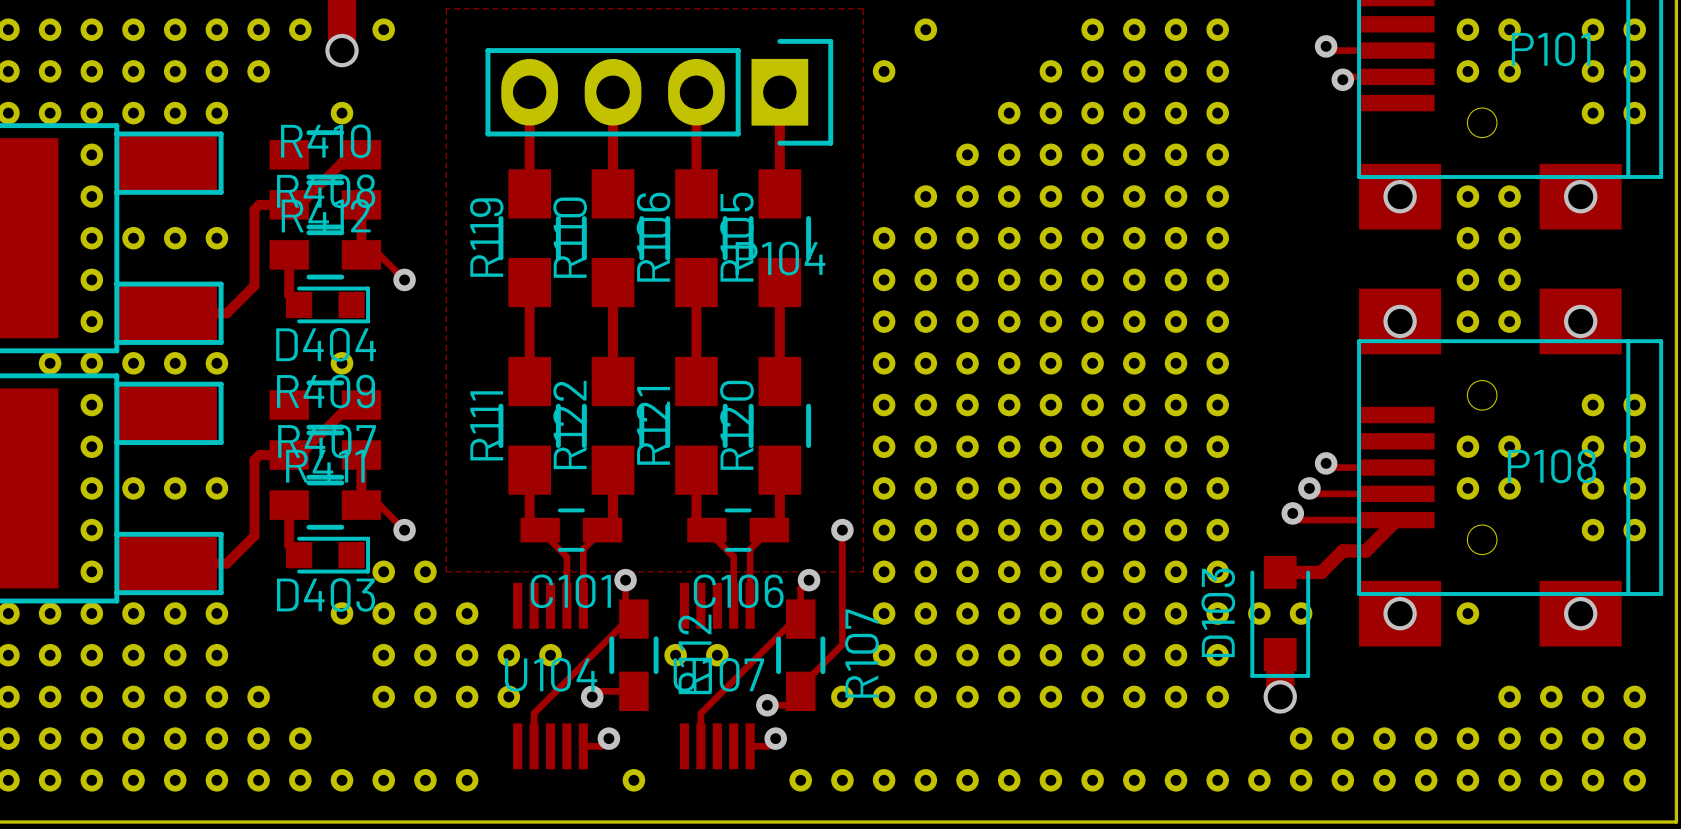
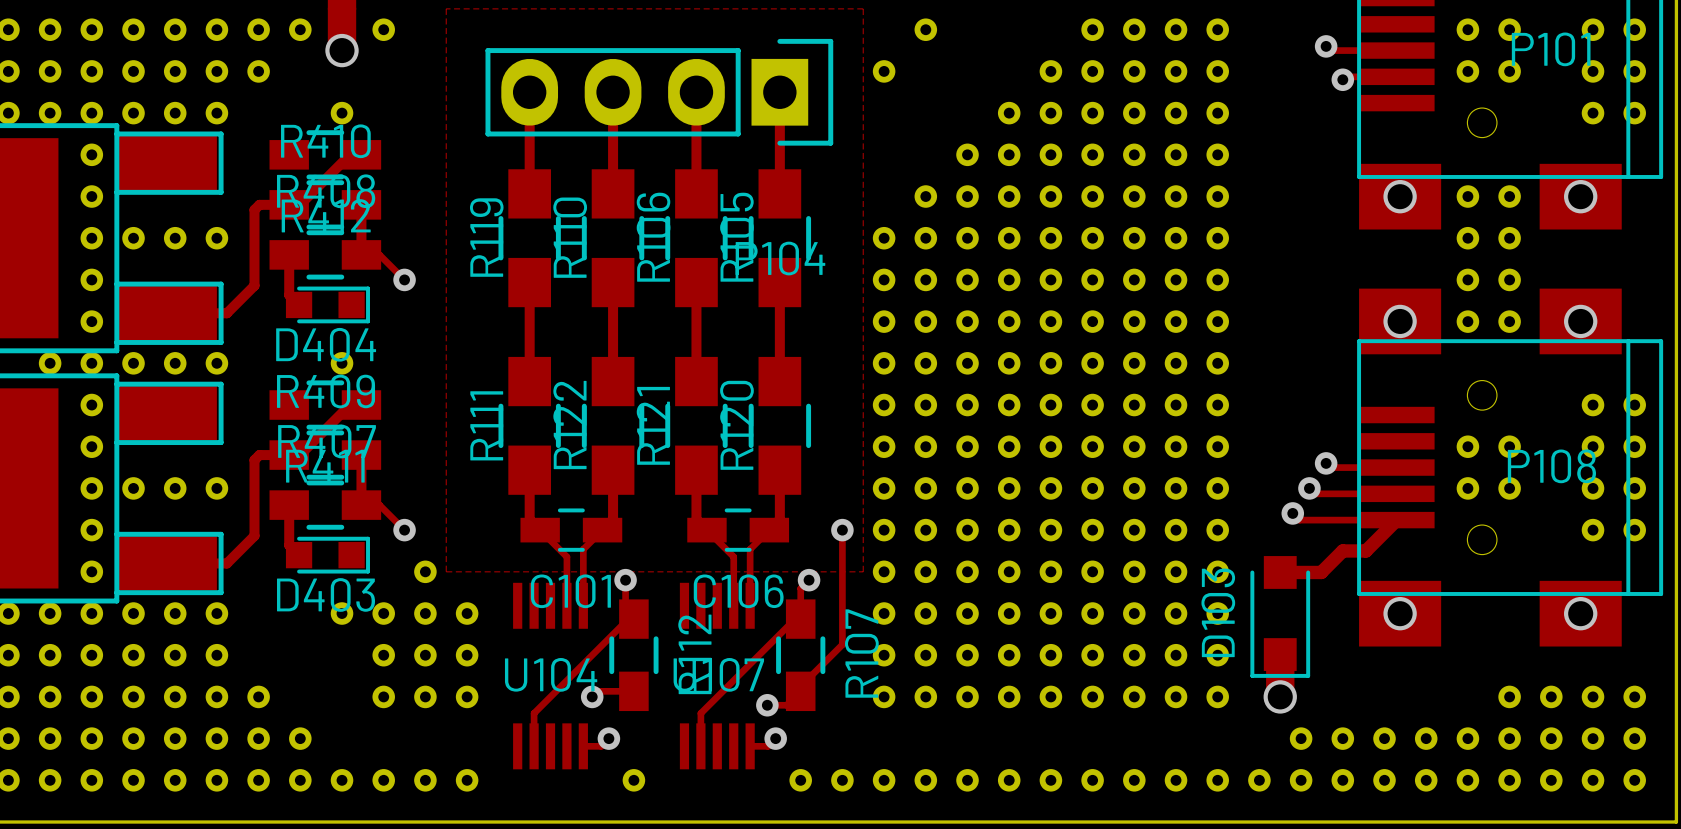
part: (383, 571) -> none
part: (1259, 613) -> none
part: (1301, 613) -> none
part: (1467, 613) -> none
part: (508, 655) -> none
part: (550, 655) -> none
part: (675, 655) -> none
part: (717, 655) -> none
part: (508, 696) -> none
part: (842, 696) -> none

